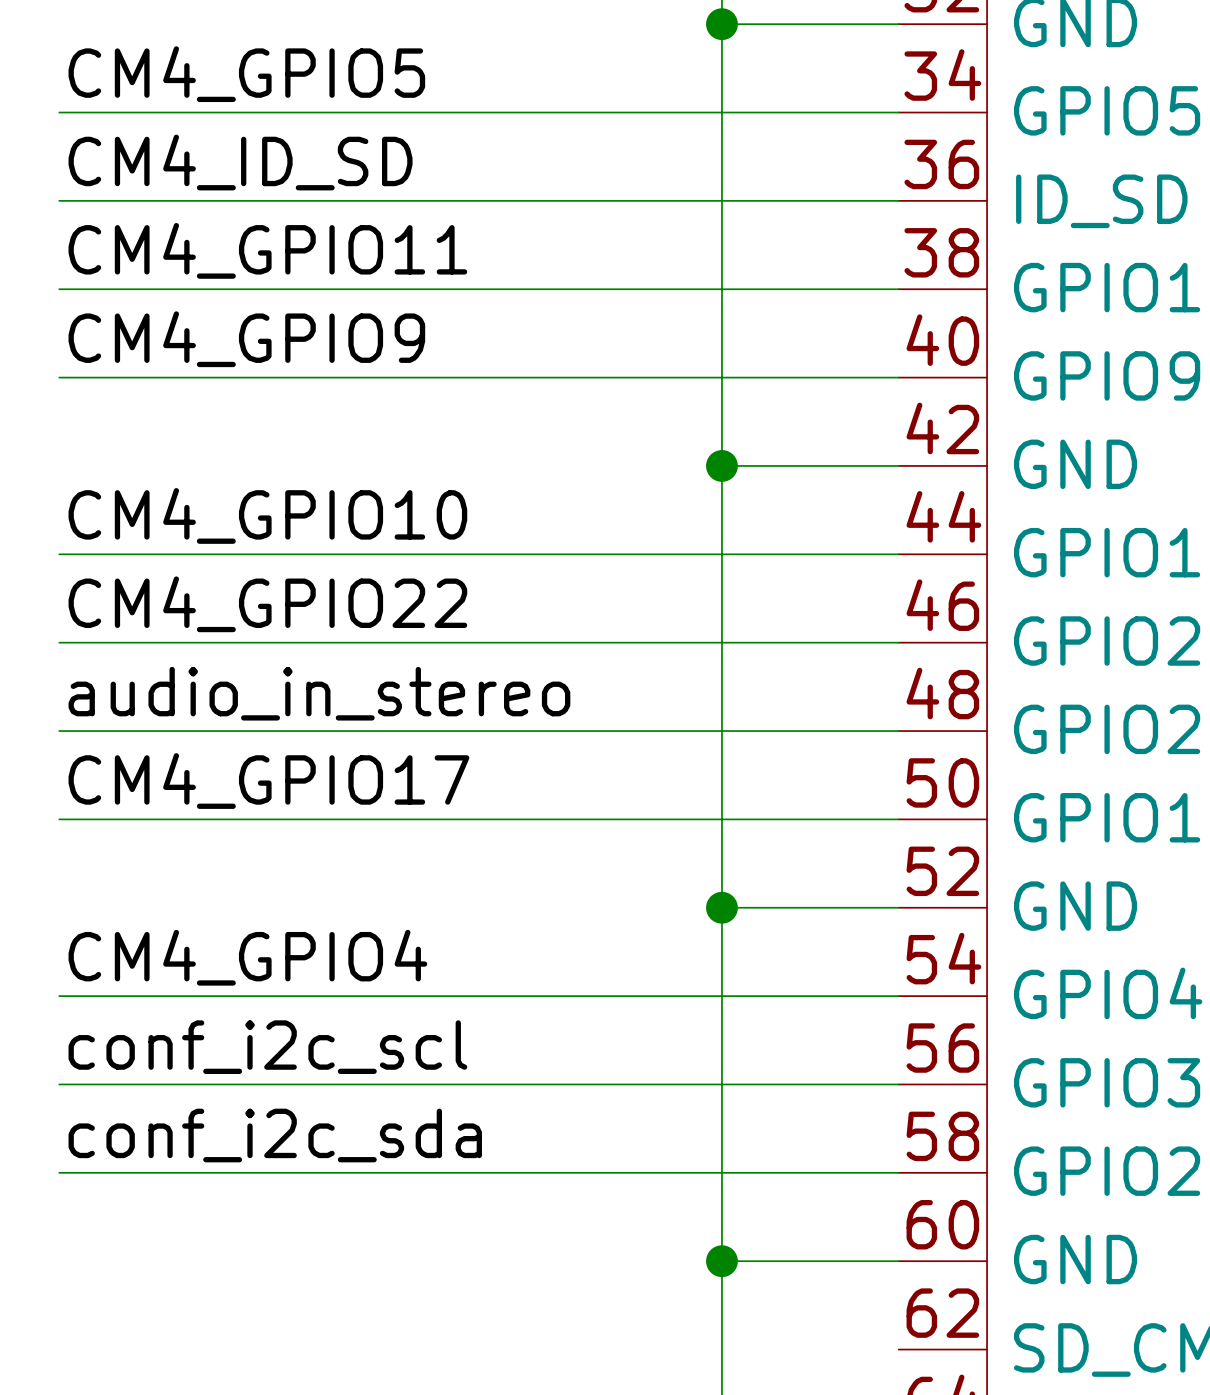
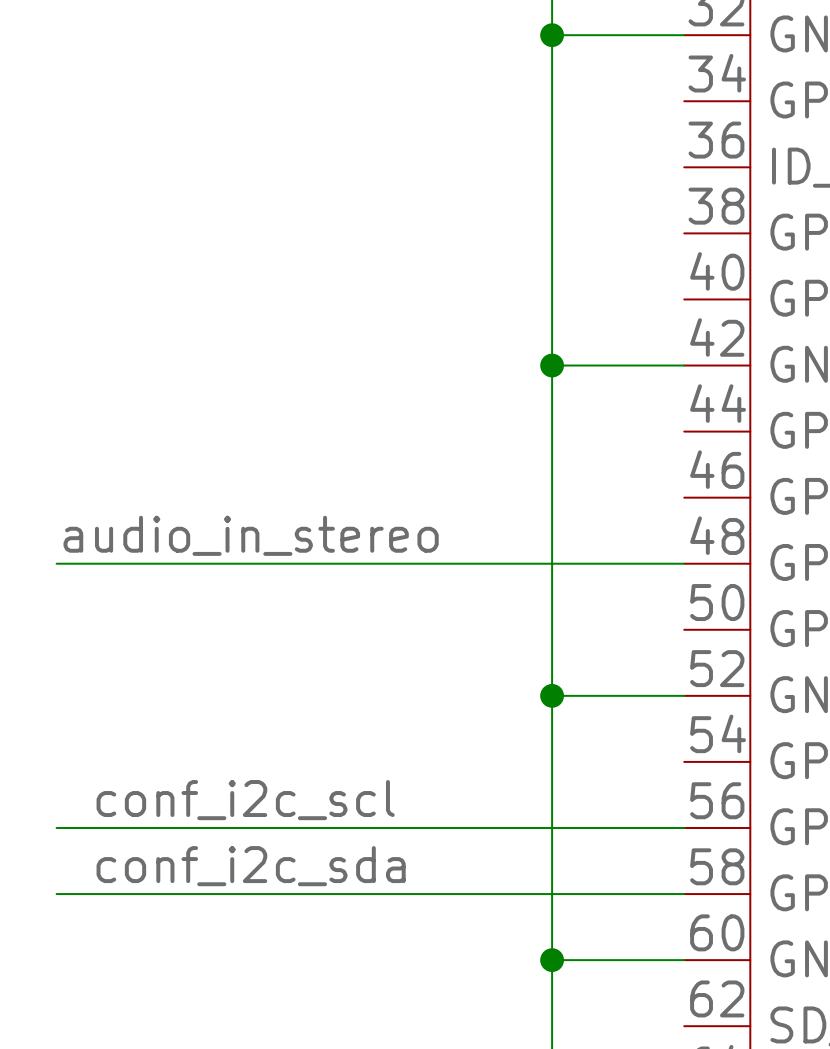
label: CM4_GPIO5 (246, 74) -> none
wire: (59, 112) (898, 112) -> none
label: CM4_ID_SD (240, 162) -> none
wire: (59, 200) (898, 200) -> none
label: CM4_GPIO11 (267, 250) -> none
wire: (59, 289) (898, 289) -> none
label: CM4_GPIO9 (246, 339) -> none
wire: (59, 377) (898, 377) -> none
label: CM4_GPIO10 (267, 515) -> none
wire: (59, 554) (898, 554) -> none
label: CM4_GPIO22 (267, 604) -> none
wire: (59, 642) (898, 642) -> none
label: CM4_GPIO17 (268, 781) -> none
wire: (59, 819) (898, 819) -> none
label: CM4_GPIO4 (247, 957) -> none
wire: (59, 996) (898, 996) -> none
label position: conf_i2c_scl (267, 1047) -> conf_i2c_scl (245, 800)
label position: conf_i2c_sda (275, 1135) -> conf_i2c_sda (251, 866)

